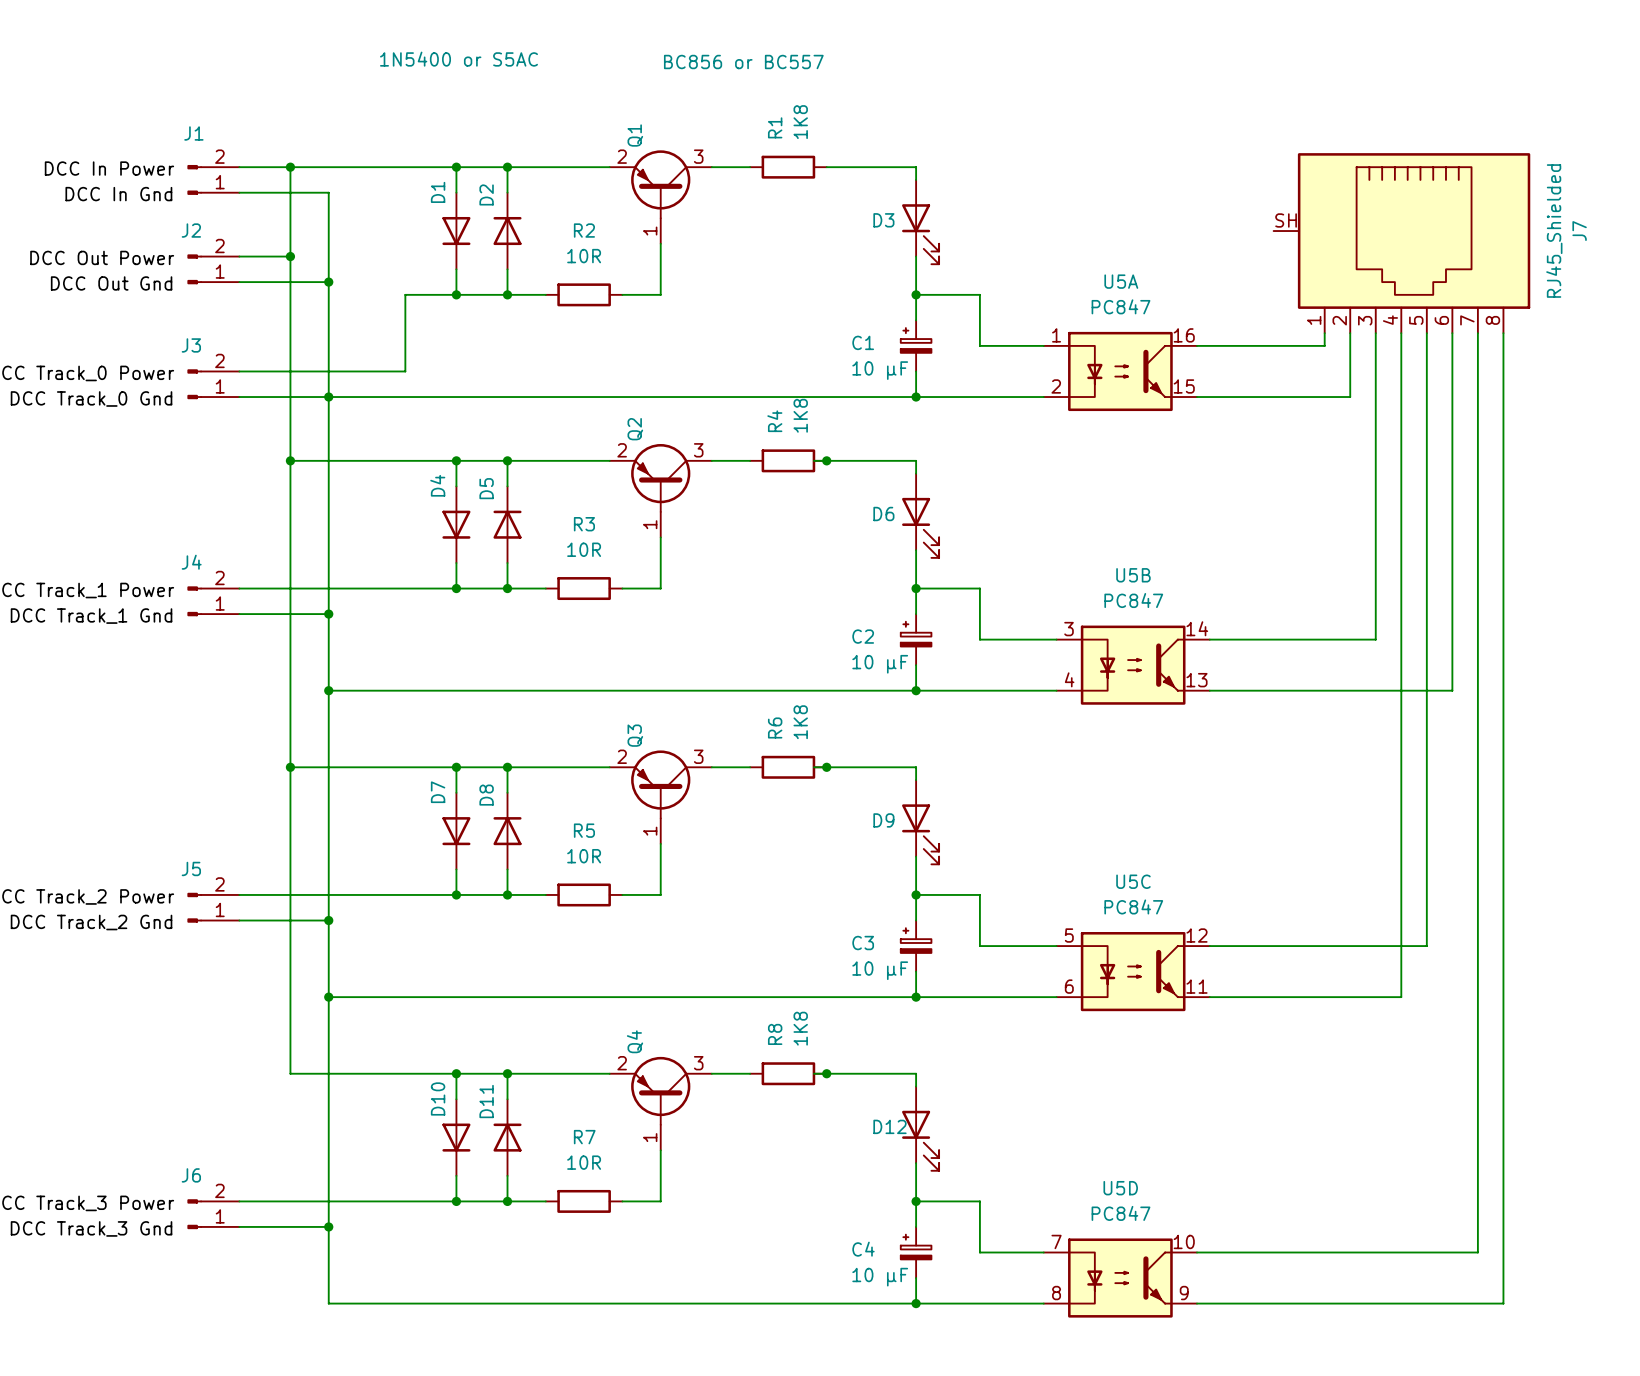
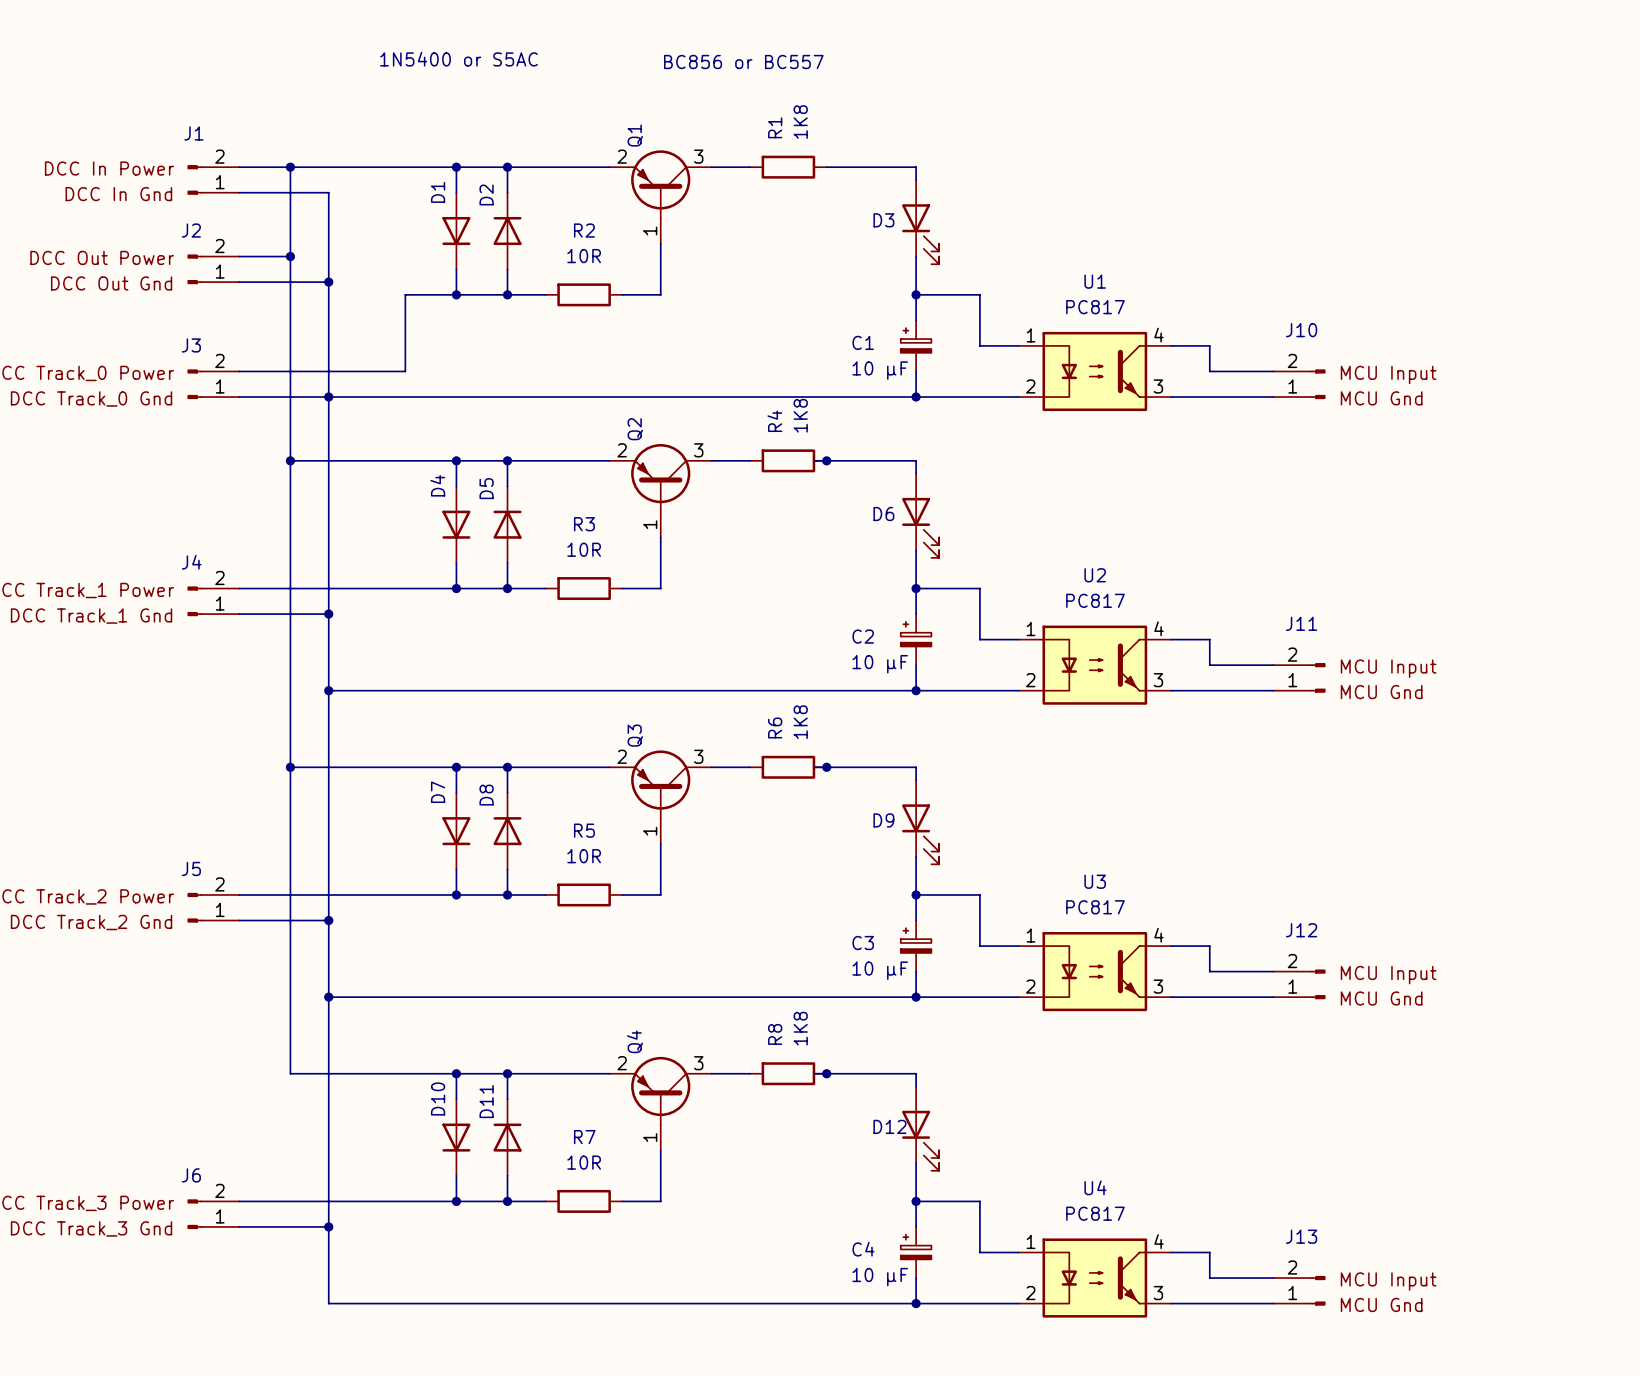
J7: RJ45_Shielded (1401, 243) -> none
wire: (1324, 333) (1324, 345) (1209, 345) -> (1273, 371) (1209, 371) (1209, 345)
wire: (1350, 333) (1350, 397) (1273, 397) -> none
wire: (1375, 333) (1375, 639) (1209, 639) -> none
wire: (1401, 333) (1401, 997) (1273, 997) -> none
wire: (1426, 333) (1426, 946) (1209, 946) -> none
wire: (1452, 333) (1452, 690) (1273, 690) -> none
wire: (1477, 333) (1477, 1252) (1209, 1252) -> (1273, 1278) (1209, 1278) (1209, 1252)
wire: (1503, 333) (1503, 1303) (1273, 1303) -> none
U1: none -> PC817 (1094, 371)
U5A: PC847 (1120, 371) -> none
label: none -> MCU Input (1388, 374)
J10: none -> (1299, 384)
label: none -> MCU Gnd (1381, 398)
wire: none -> (1171, 639) (1209, 639) (1209, 665) (1273, 665)
U2: none -> PC817 (1094, 665)
U5B: PC847 (1133, 665) -> none
label: none -> MCU Input (1388, 668)
J11: none -> (1299, 677)
label: none -> MCU Gnd (1381, 692)
wire: none -> (1171, 946) (1209, 946) (1209, 971) (1273, 971)
U3: none -> PC817 (1094, 971)
U5C: PC847 (1133, 971) -> none
label: none -> MCU Input (1388, 975)
J12: none -> (1299, 984)
label: none -> MCU Gnd (1381, 998)
U4: none -> PC817 (1094, 1278)
U5D: PC847 (1120, 1278) -> none
label: none -> MCU Input (1388, 1281)
J13: none -> (1299, 1290)
label: none -> MCU Gnd (1381, 1304)

